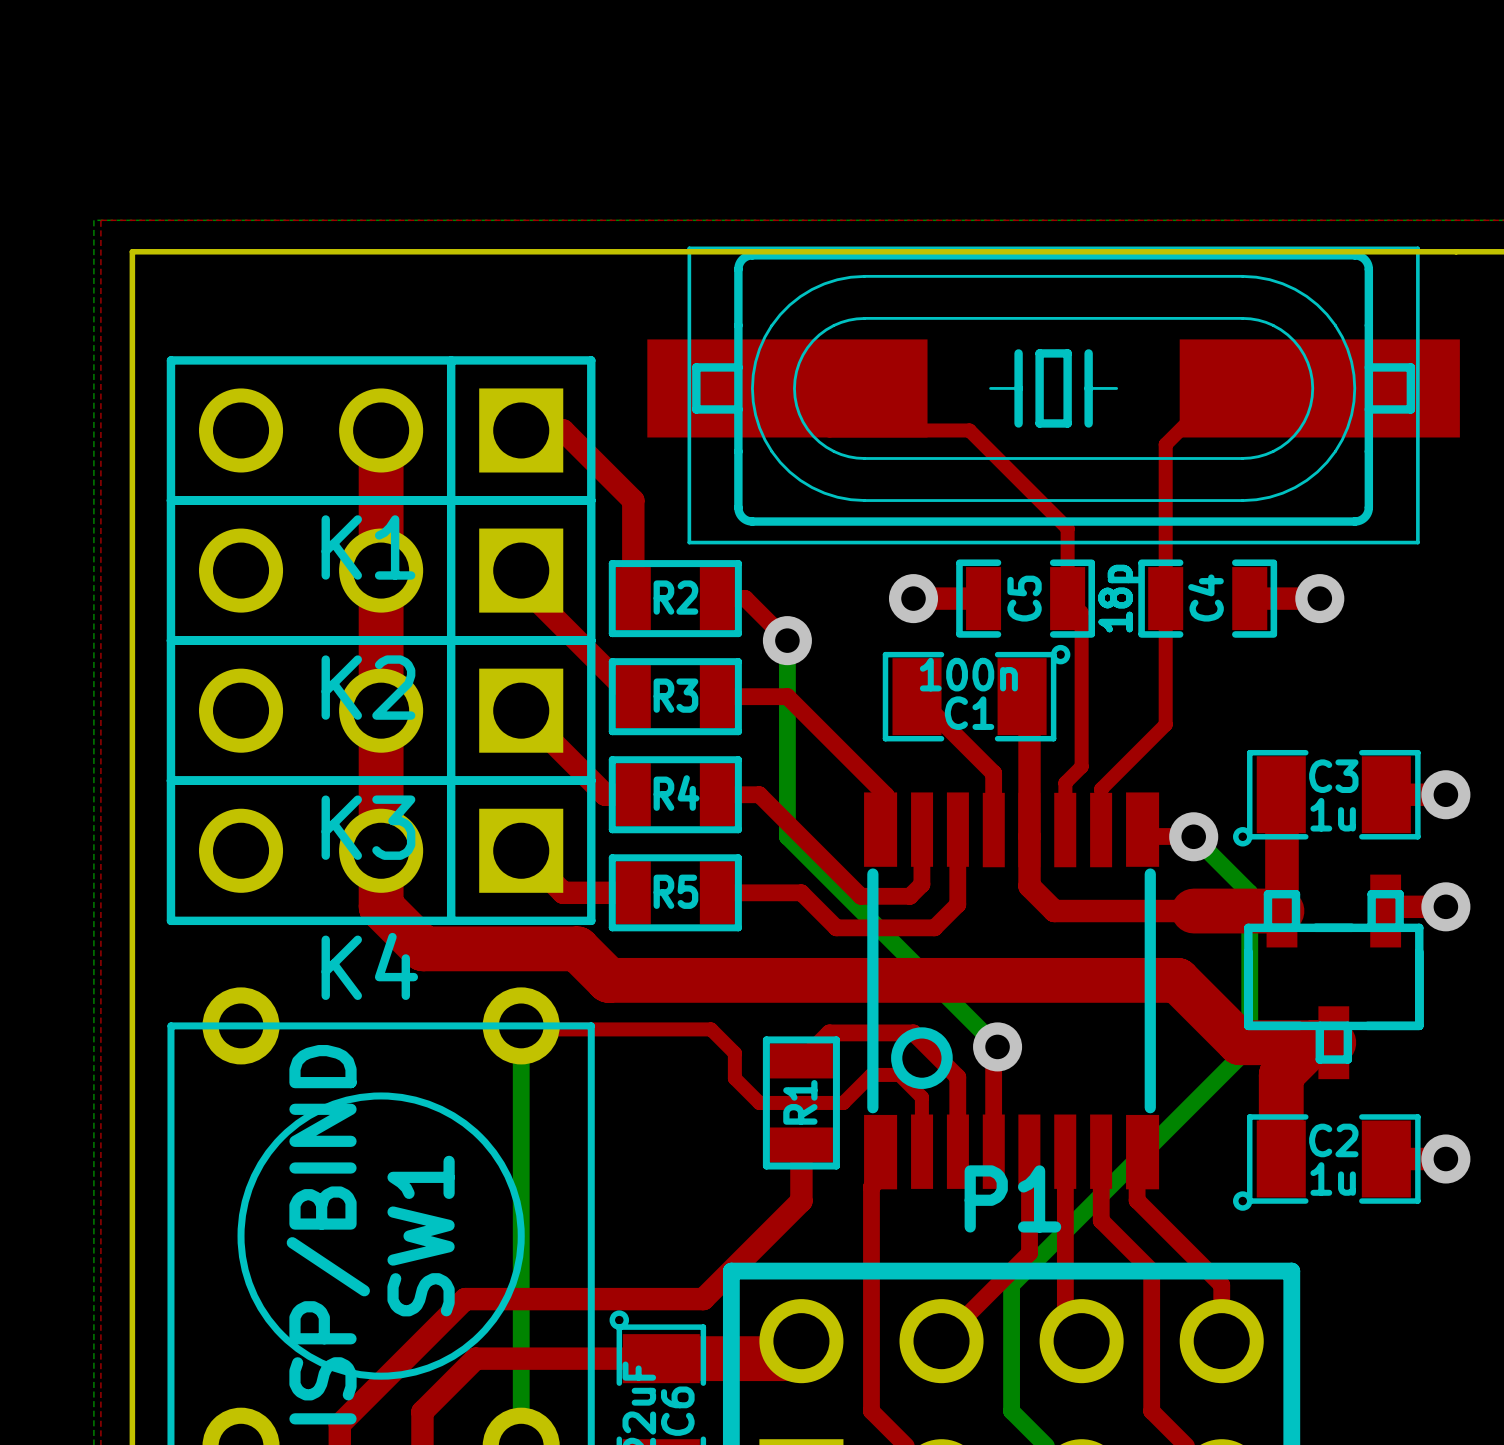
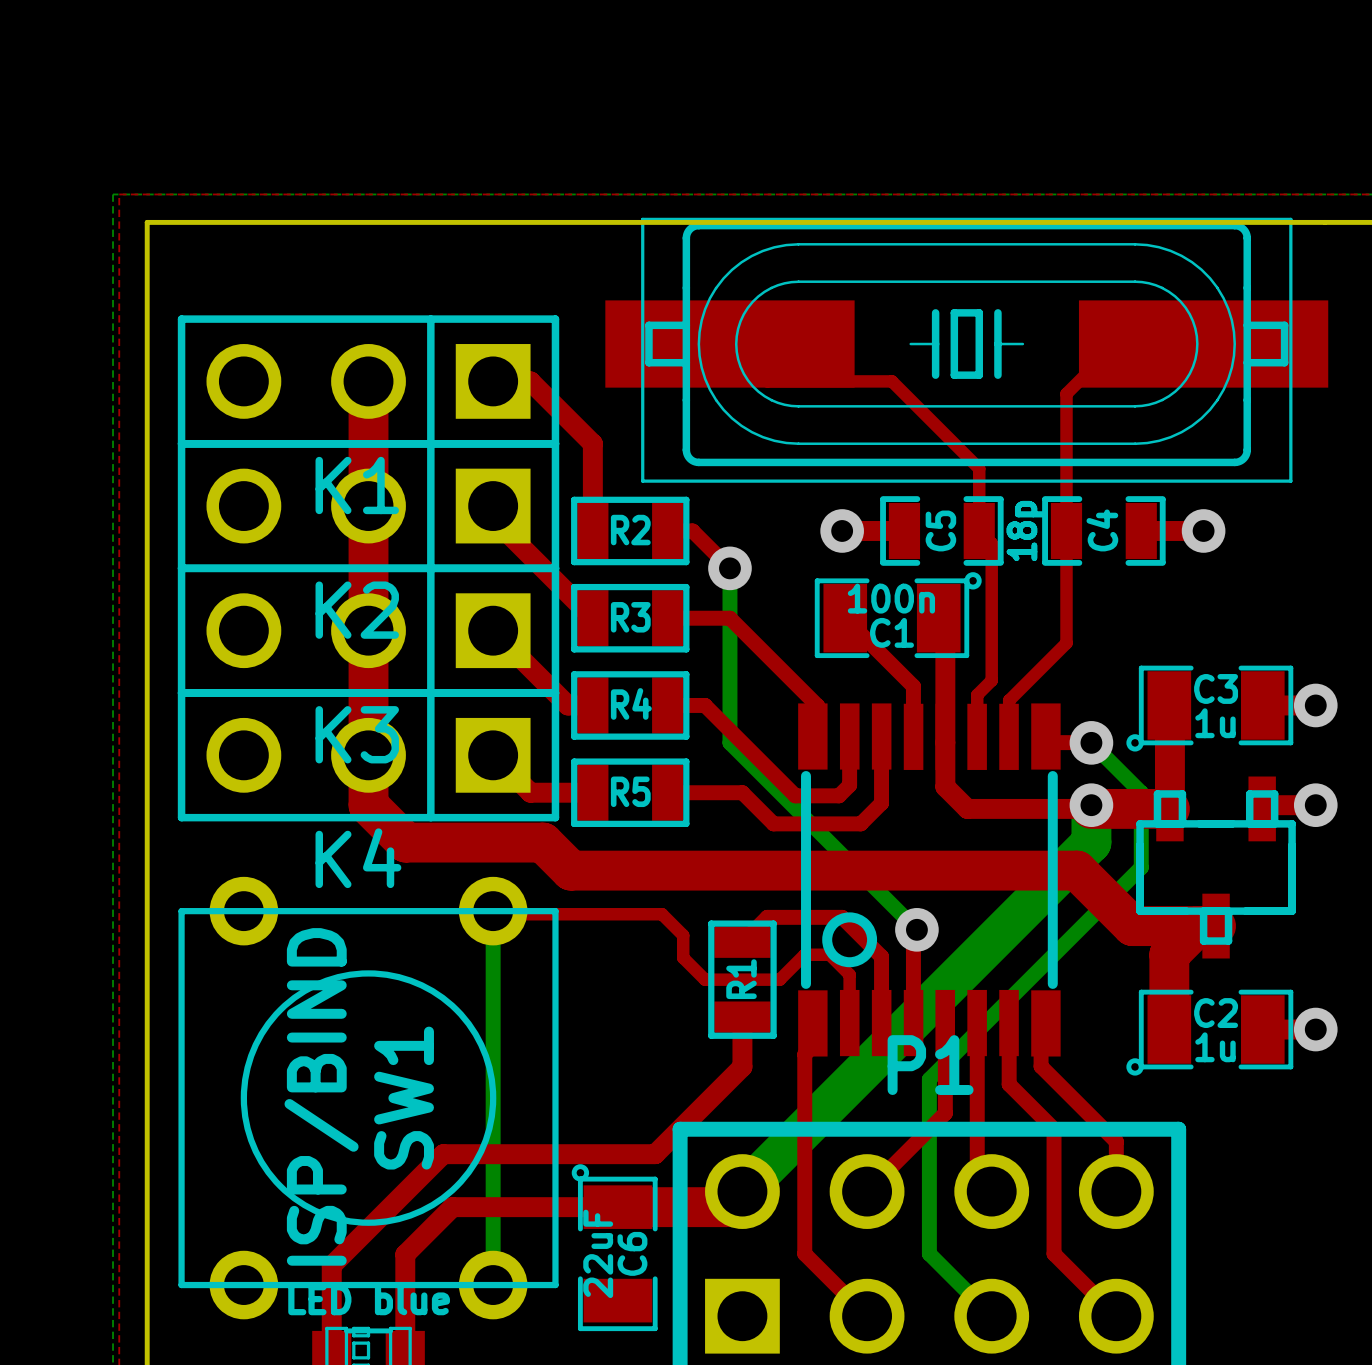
bottom track: none -> (1091, 805) (1091, 842) (742, 1191)
via: none -> (1091, 805)
bottom track: (1249, 976) (1249, 1046) (1011, 1285) -> (1141, 867) (929, 1079) (929, 1141)

